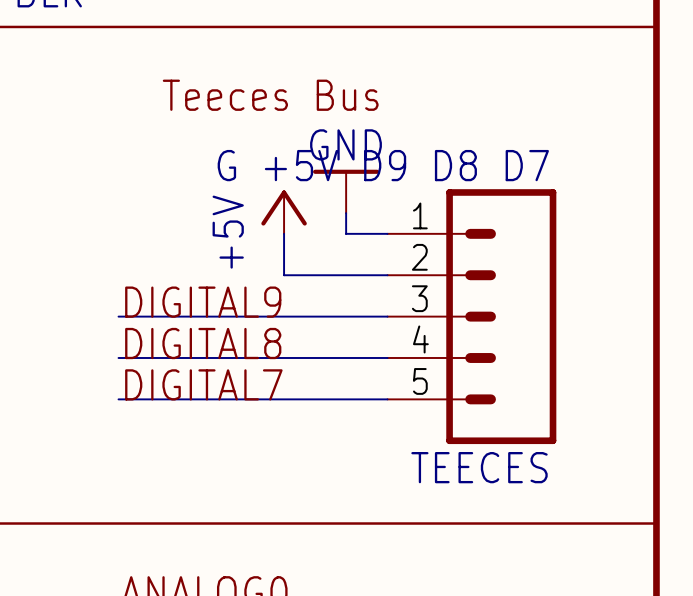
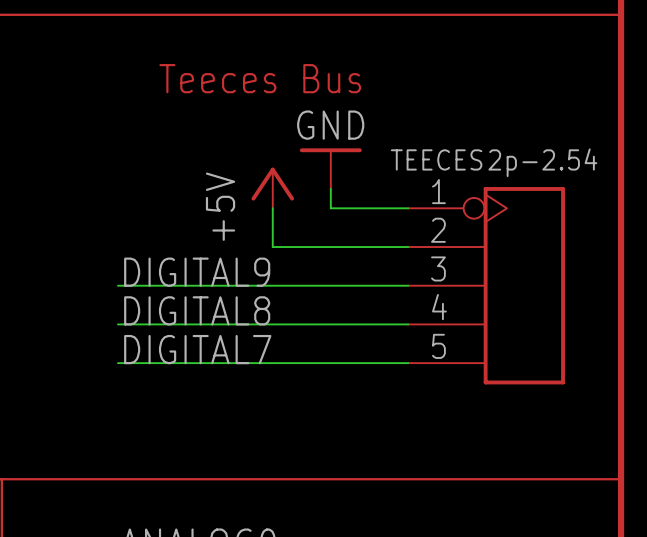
TEECES: G +5V D9 D8 D7 (471, 316) -> none
TEECES: none -> 2p-2.54 (486, 285)

